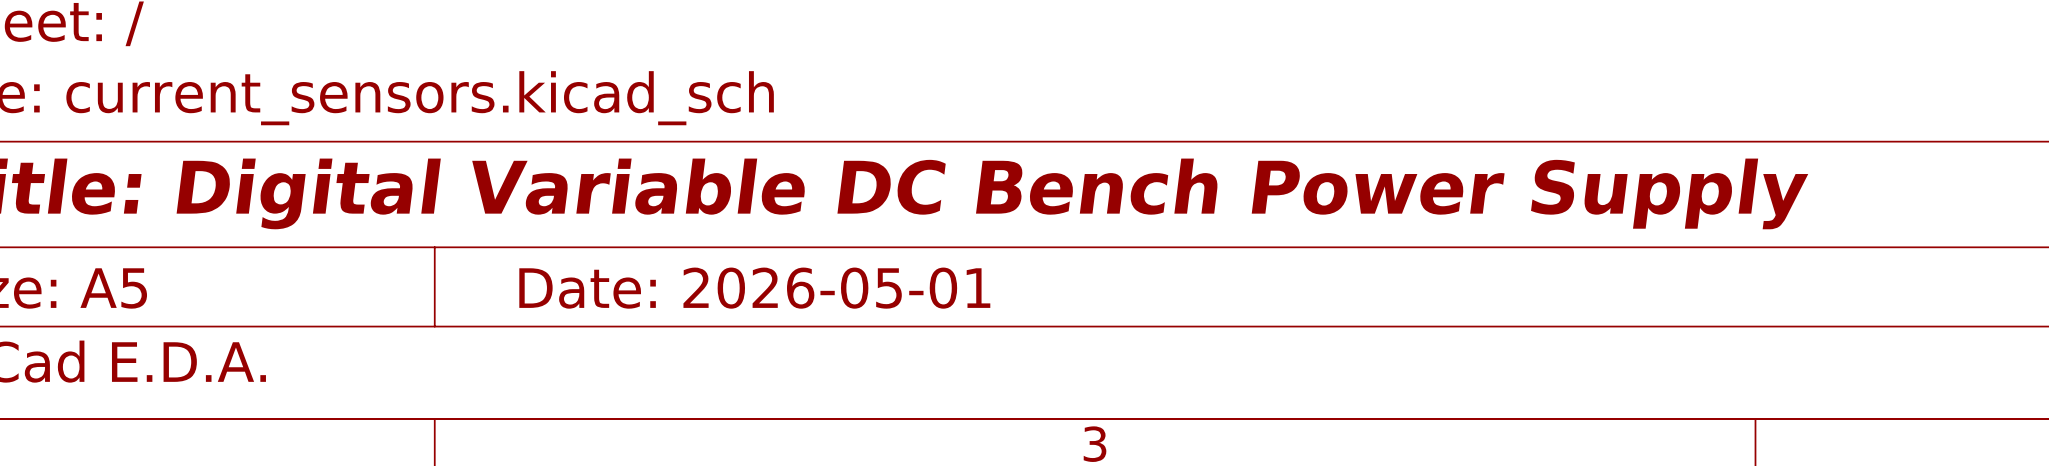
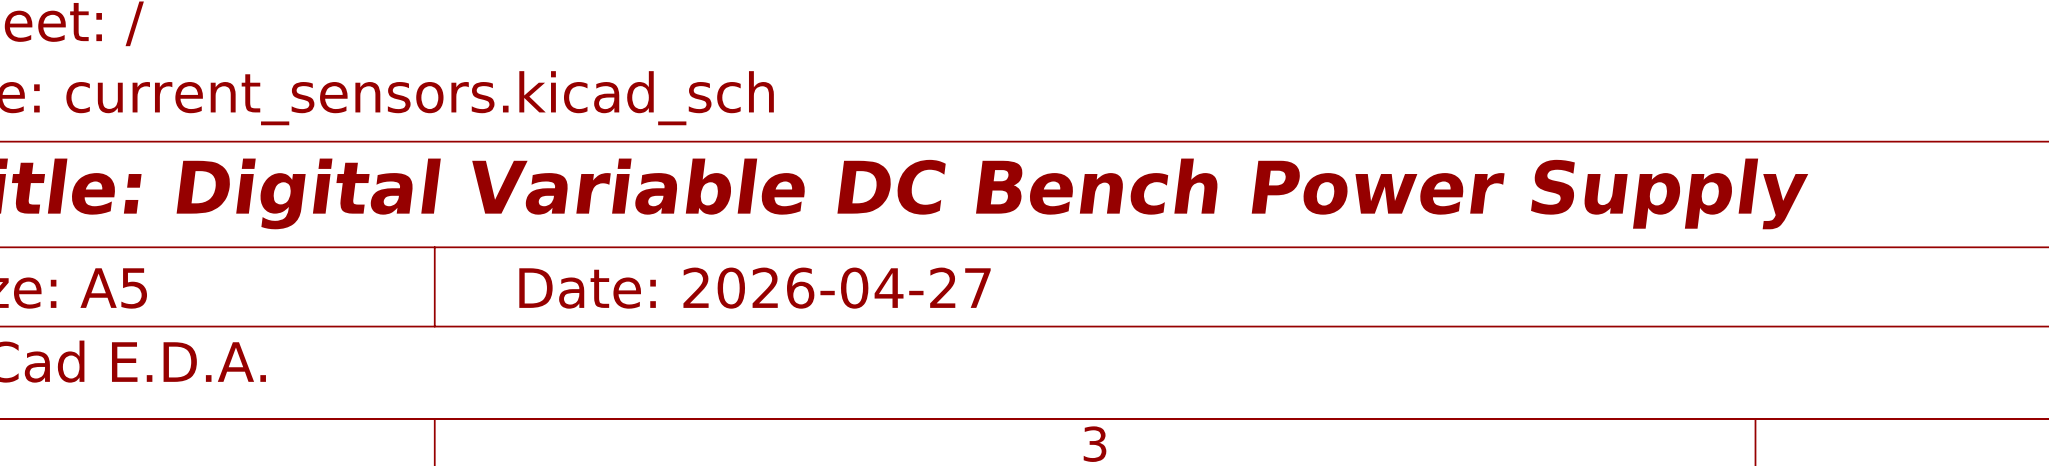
title block: Date: 2026-05-01 (754, 288) -> Date: 2026-04-27 (755, 288)

